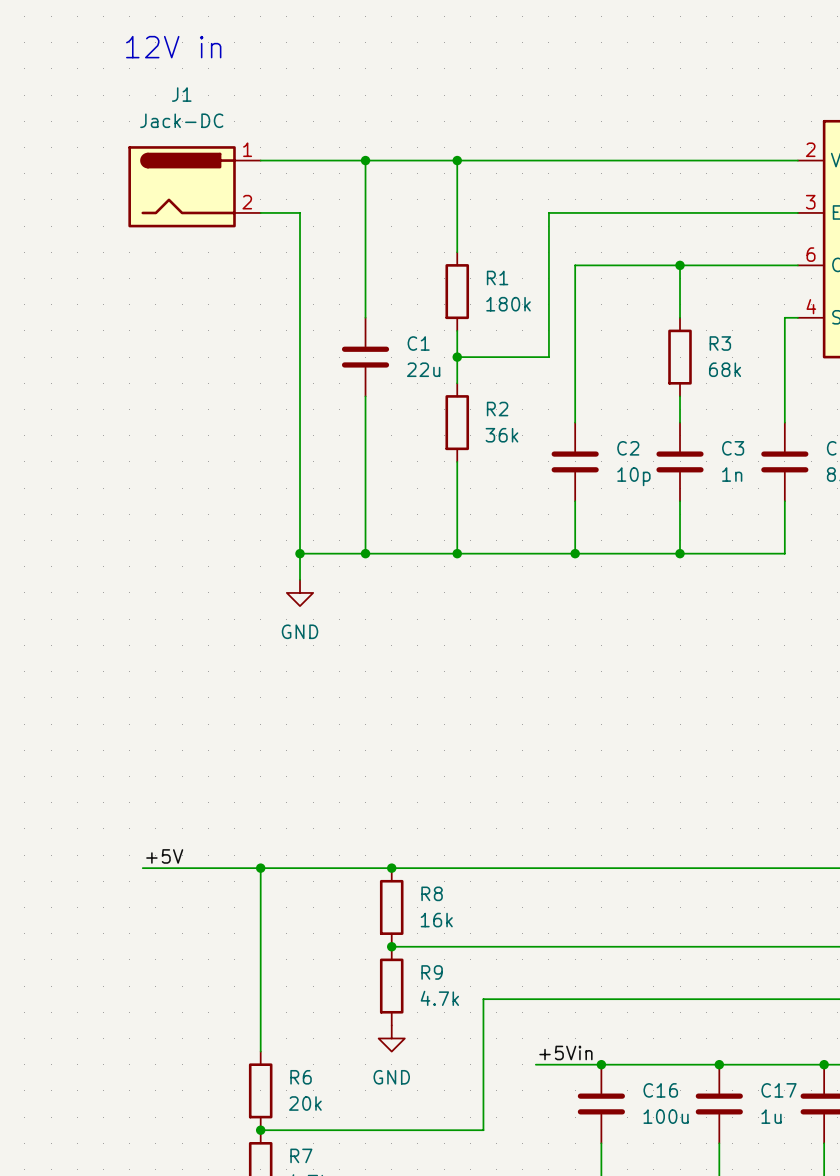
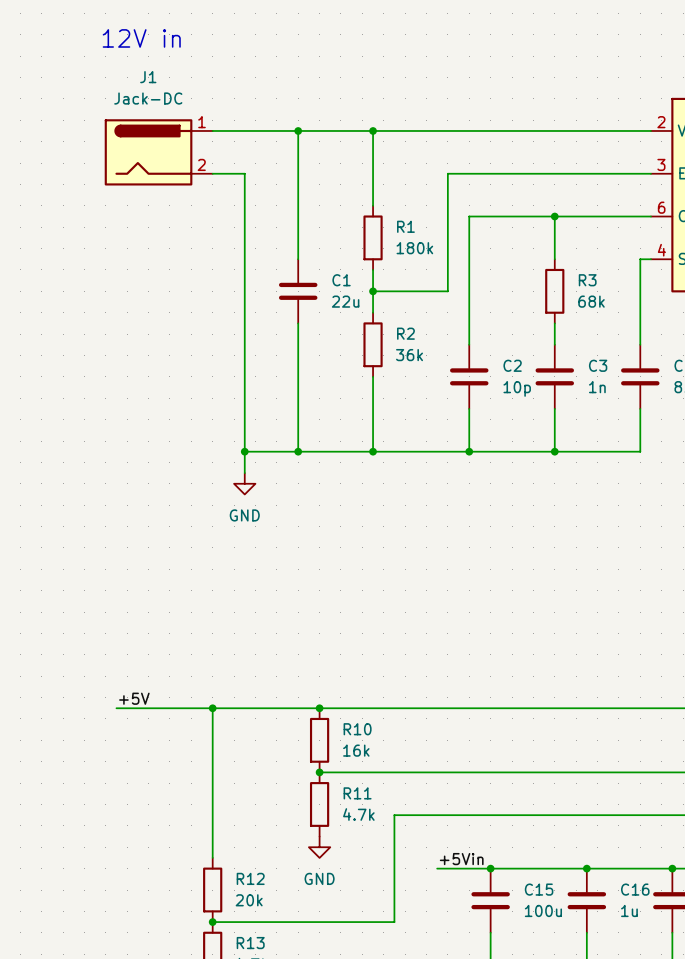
R8 name: R8 (432, 893) -> R10 (357, 729)
R9 name: R9 (432, 972) -> R11 (357, 793)
R6 name: R6 (301, 1077) -> R12 (250, 878)
C16 name: C16 (660, 1090) -> C15 (539, 889)
C17 name: C17 (779, 1090) -> C16 (635, 889)
R7 name: R7 (301, 1155) -> R13 (250, 943)

